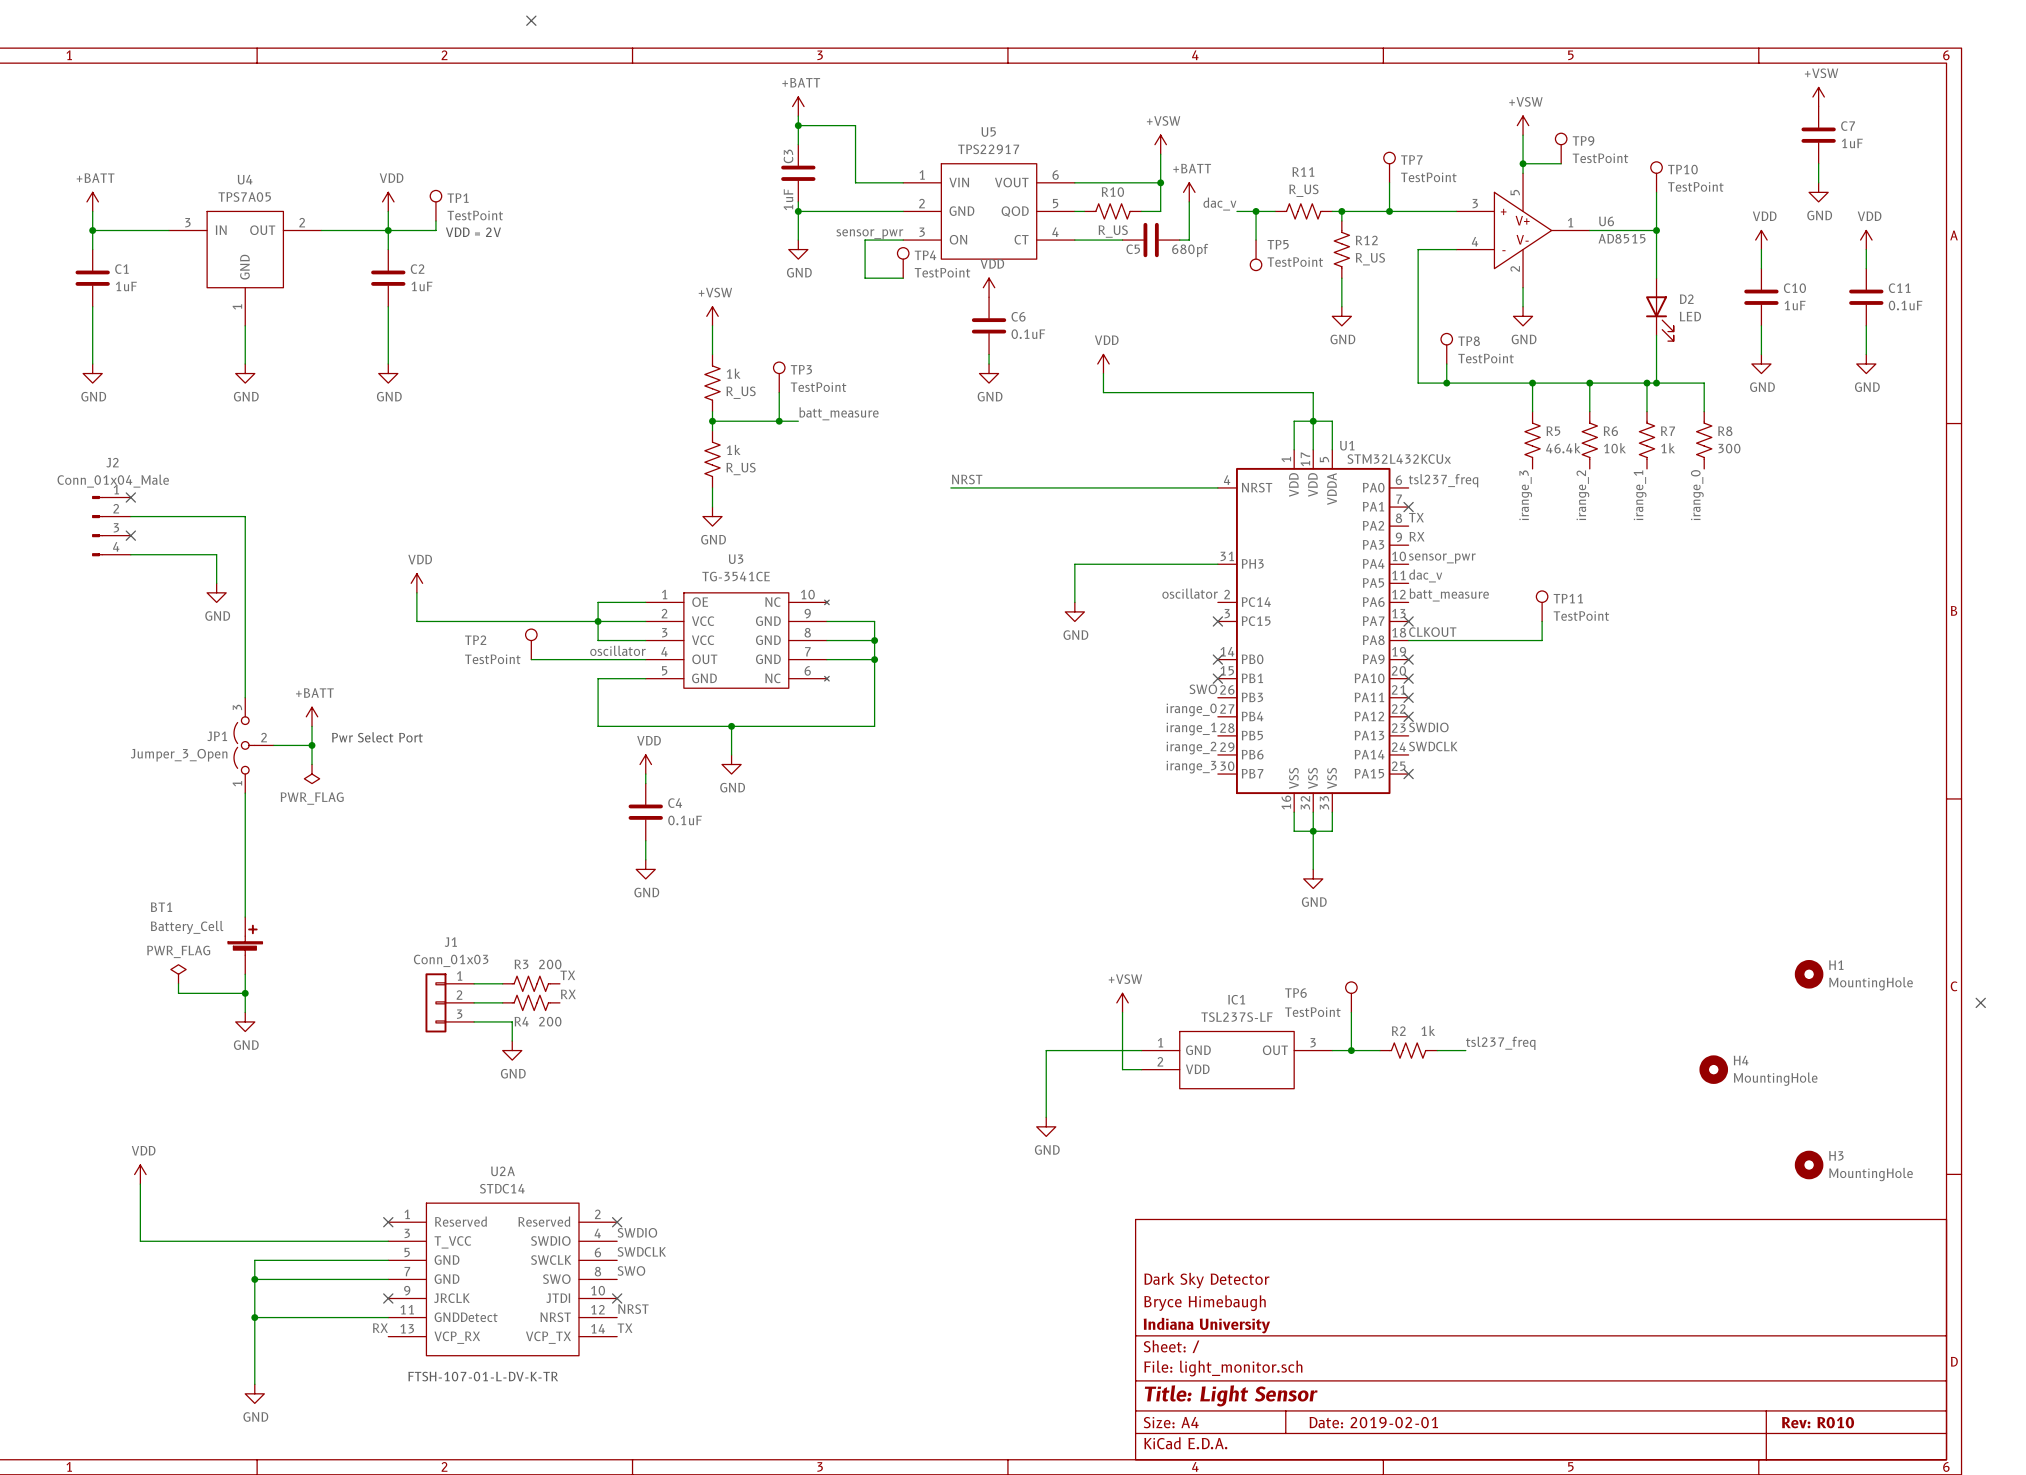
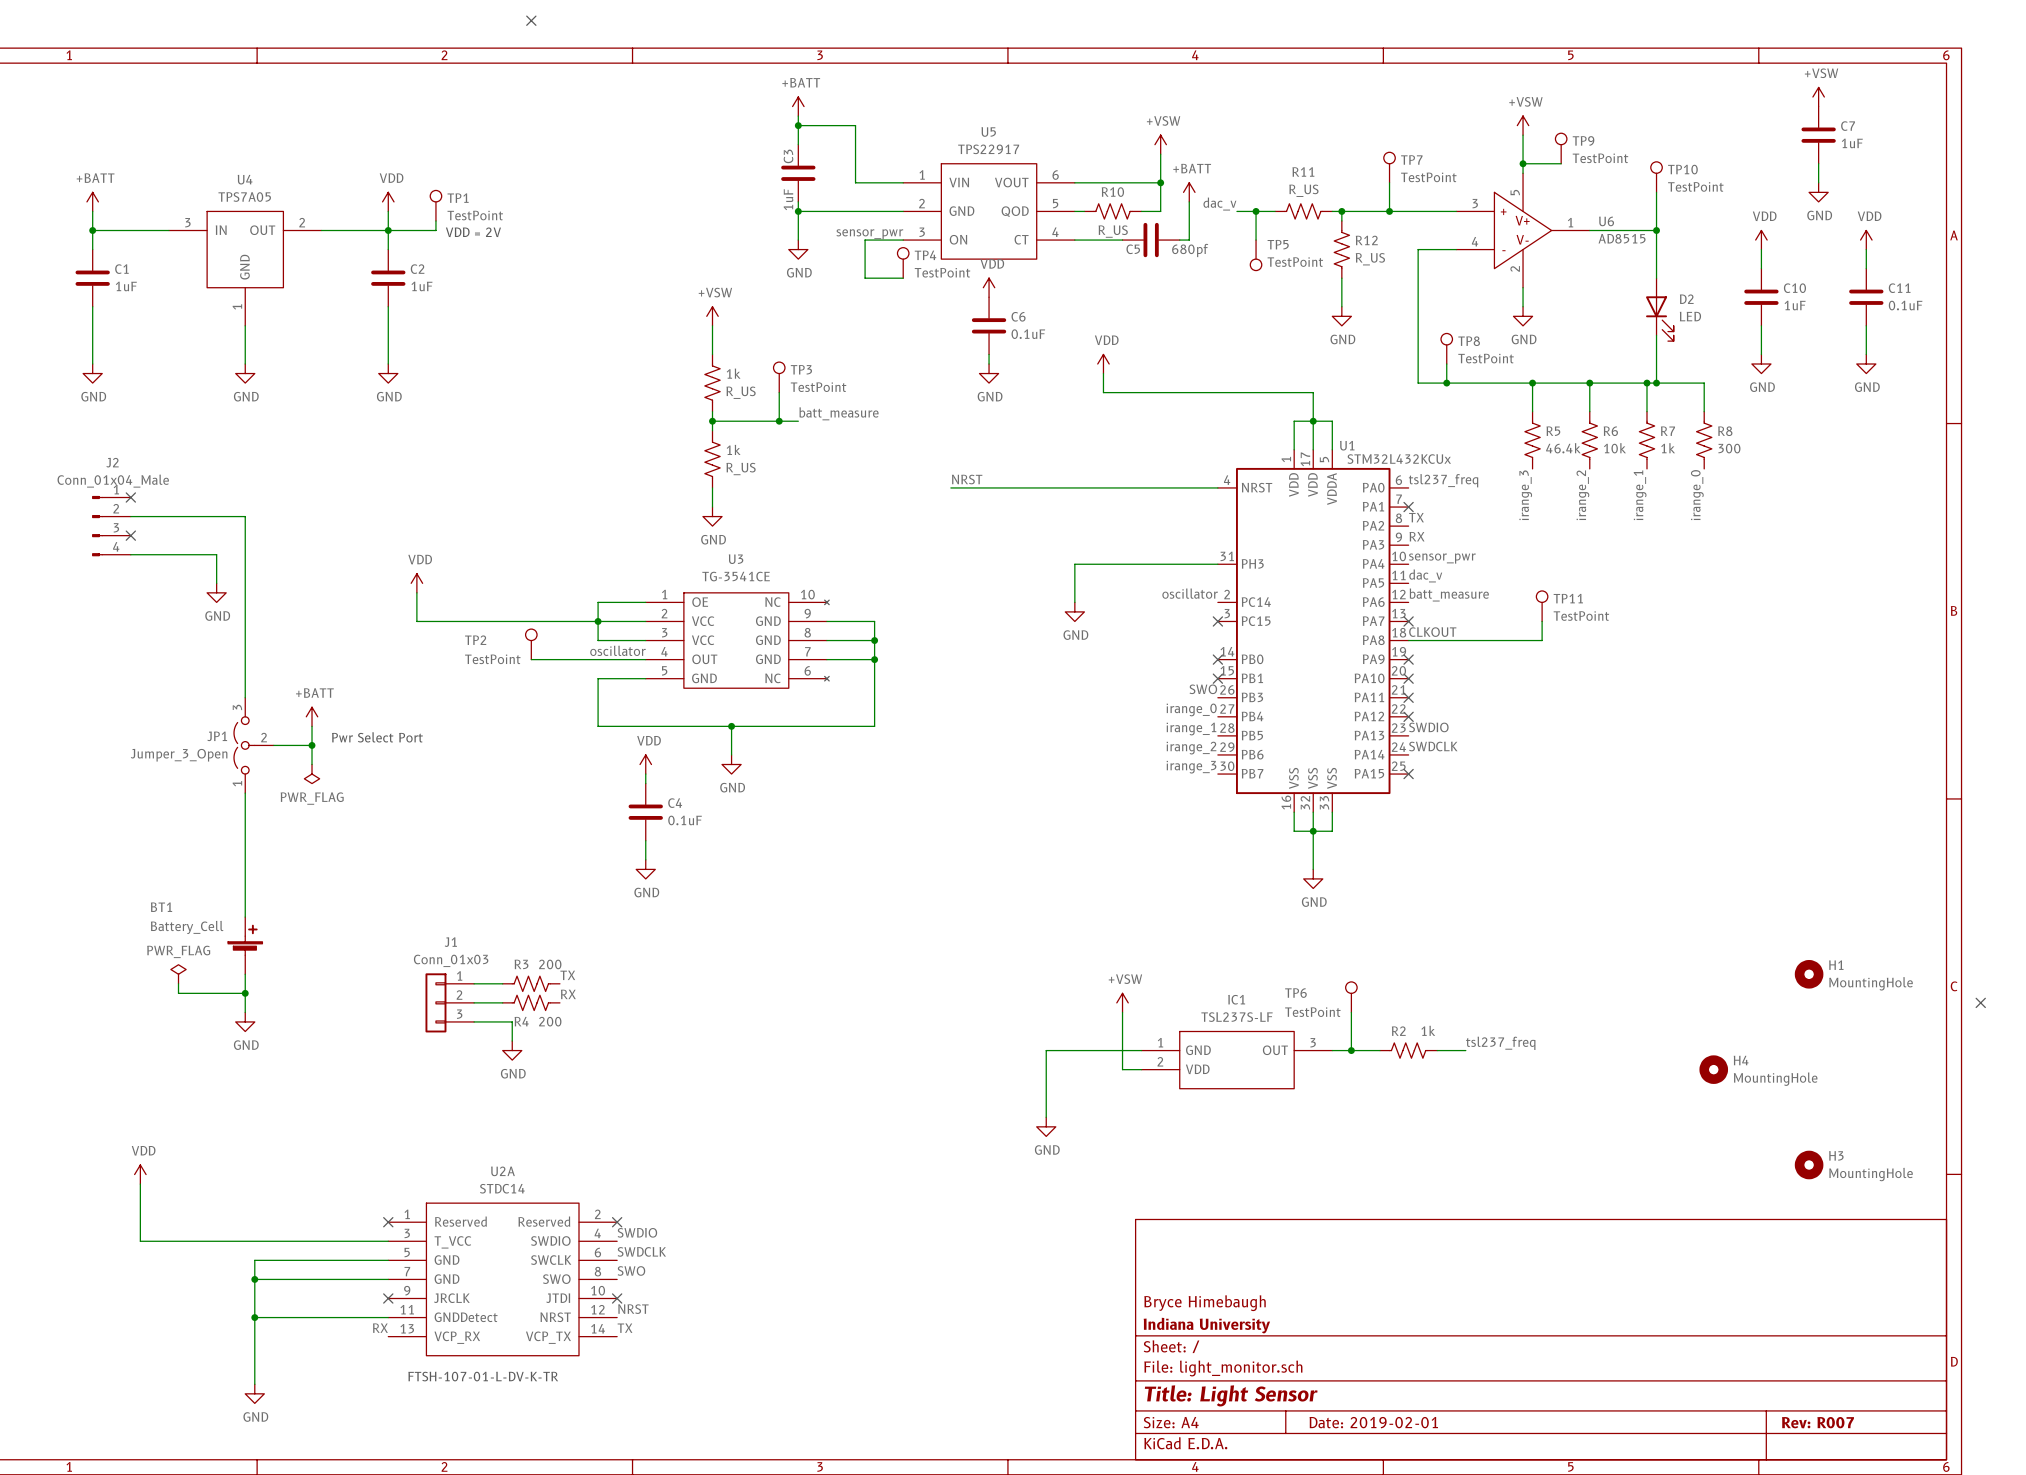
title block: Dark Sky Detector (1206, 1280) -> none
title block: Rev: R010 (1818, 1422) -> Rev: R007 (1817, 1422)

